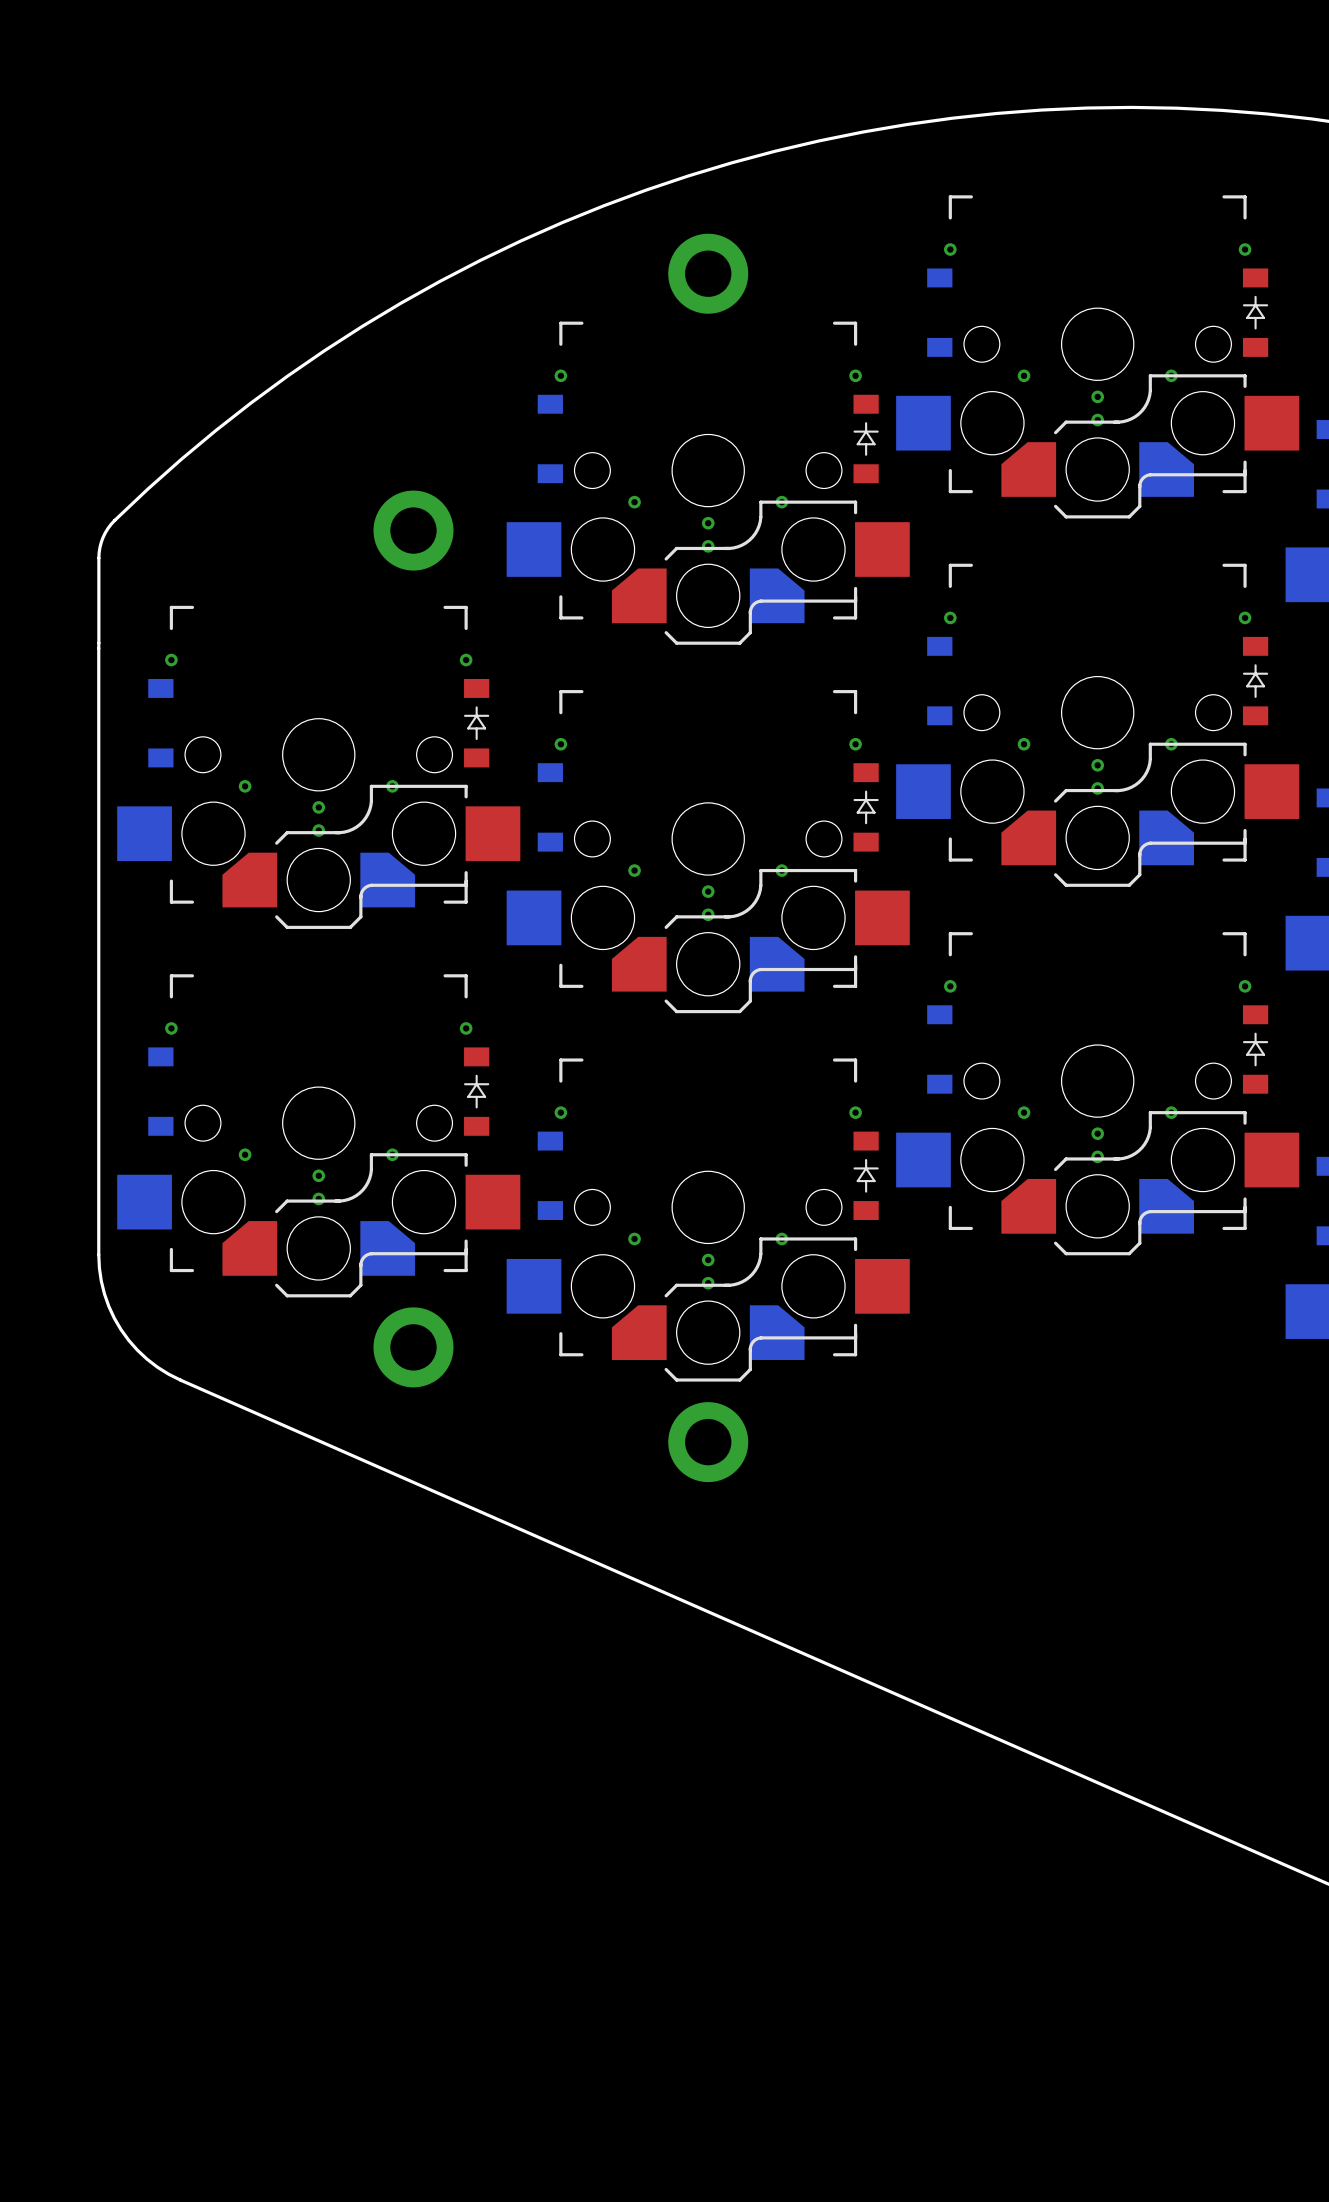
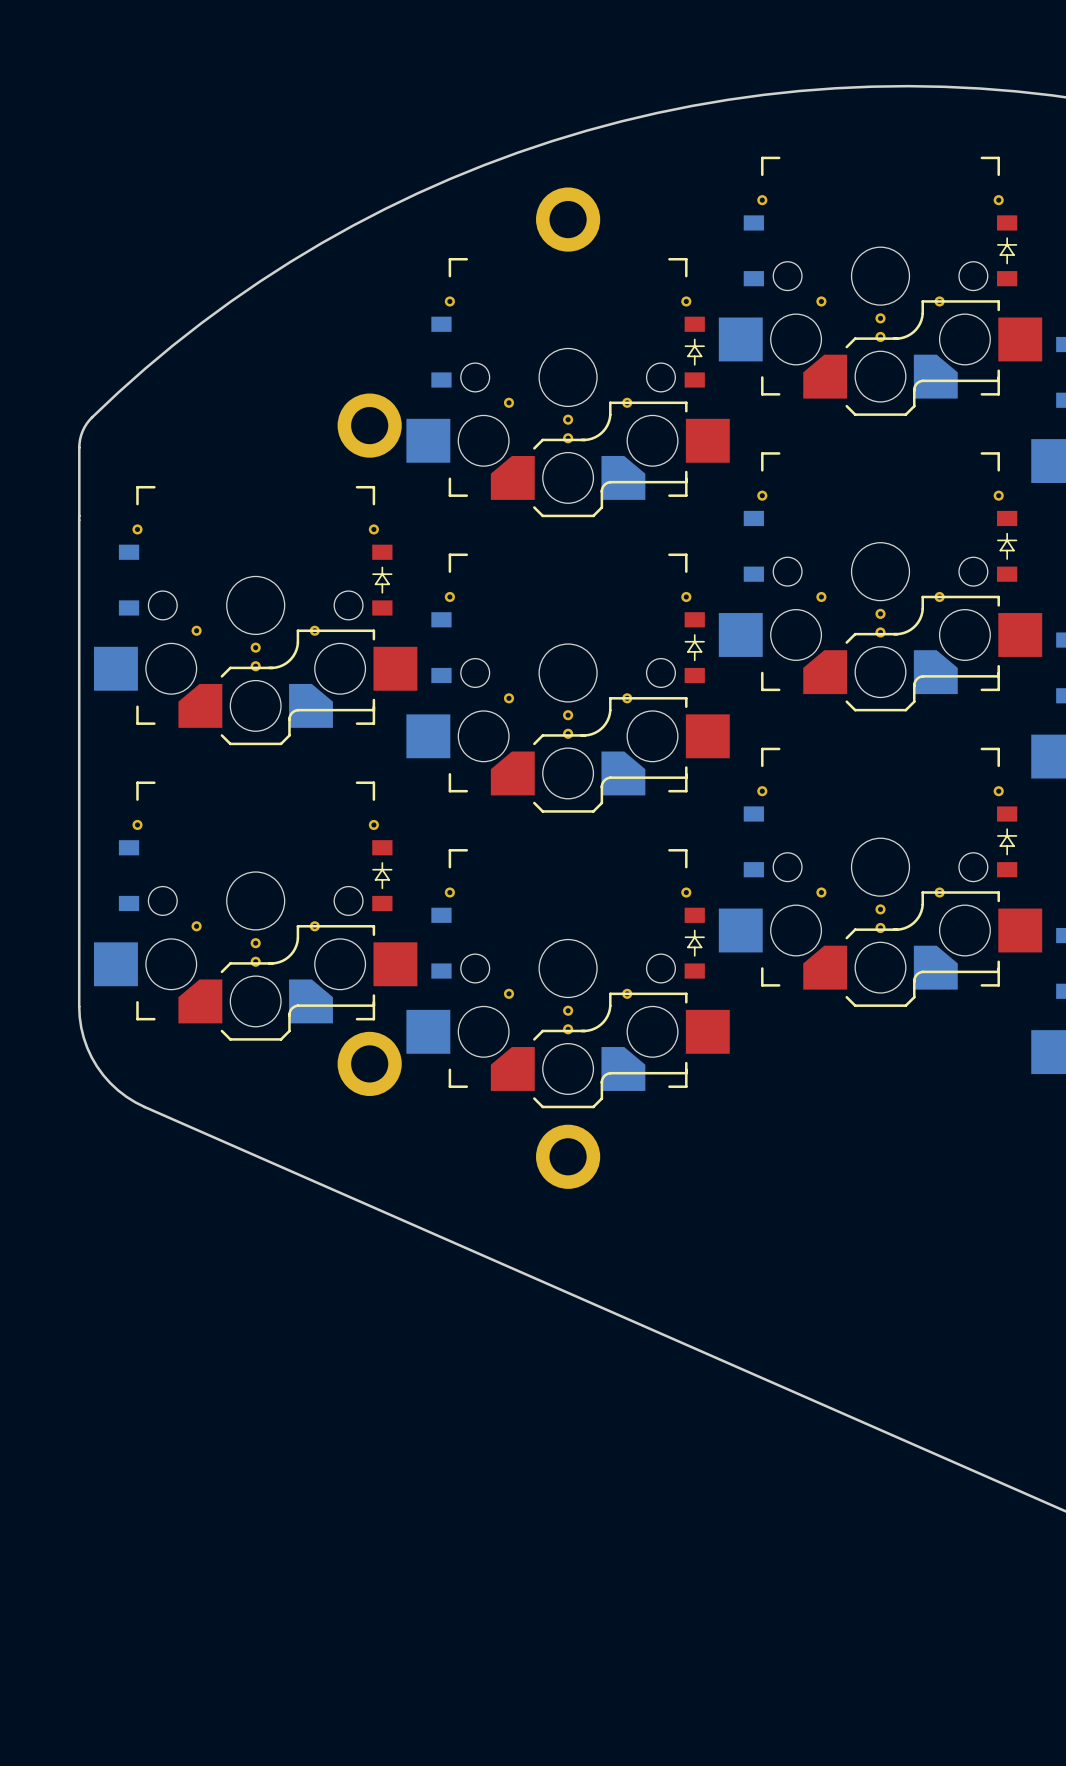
part position: (413, 530) -> (369, 425)
part position: (413, 1347) -> (369, 1063)

